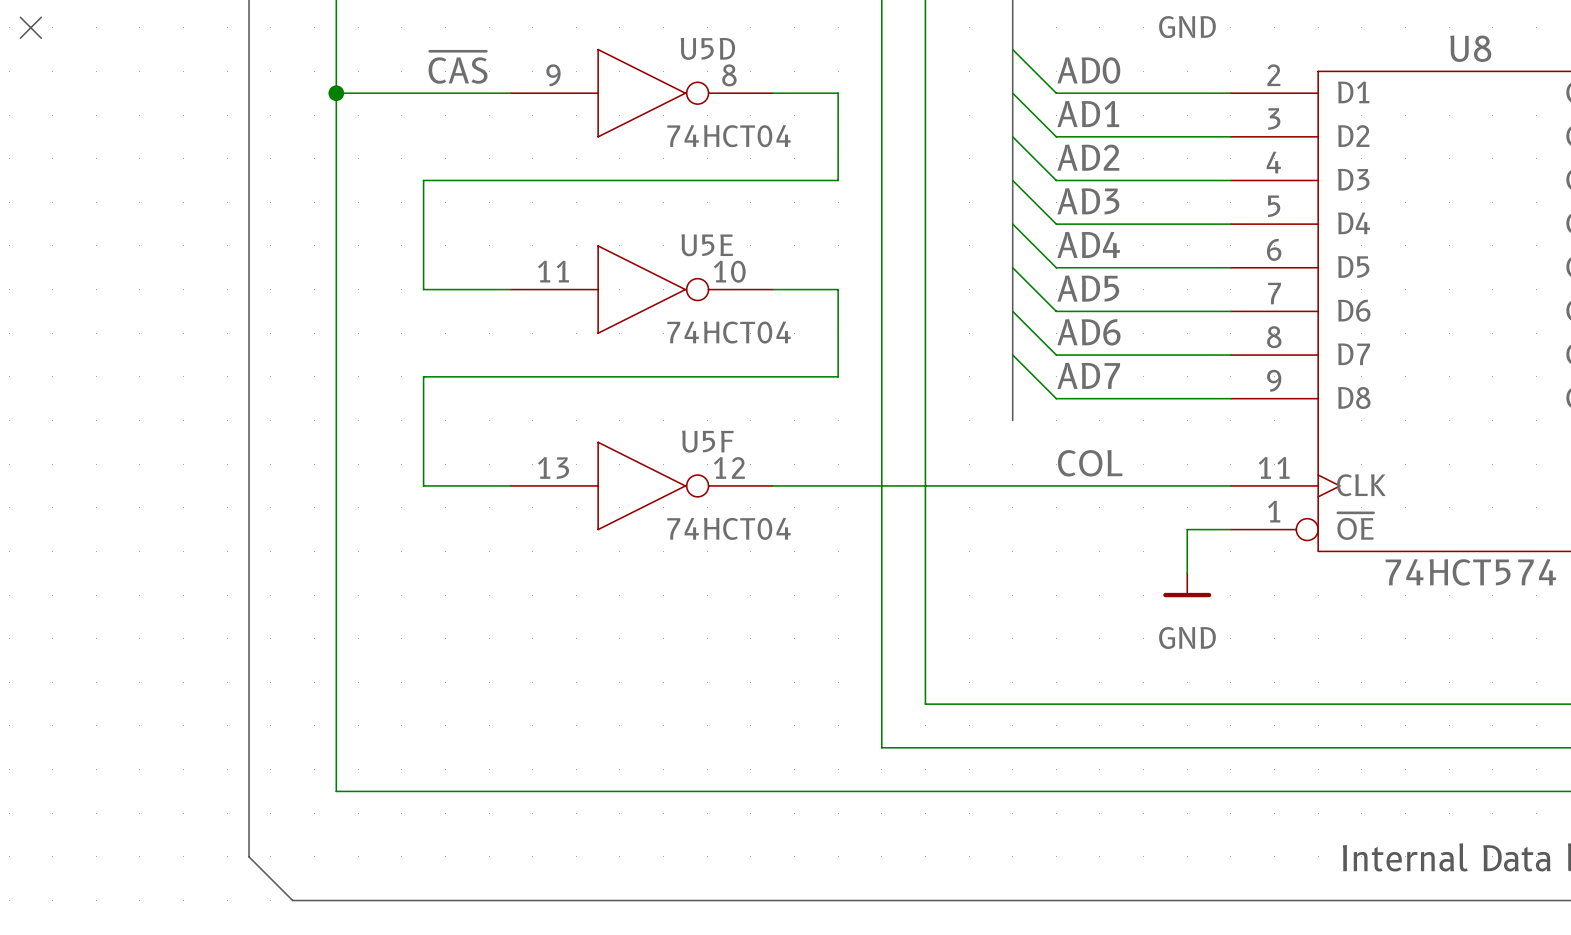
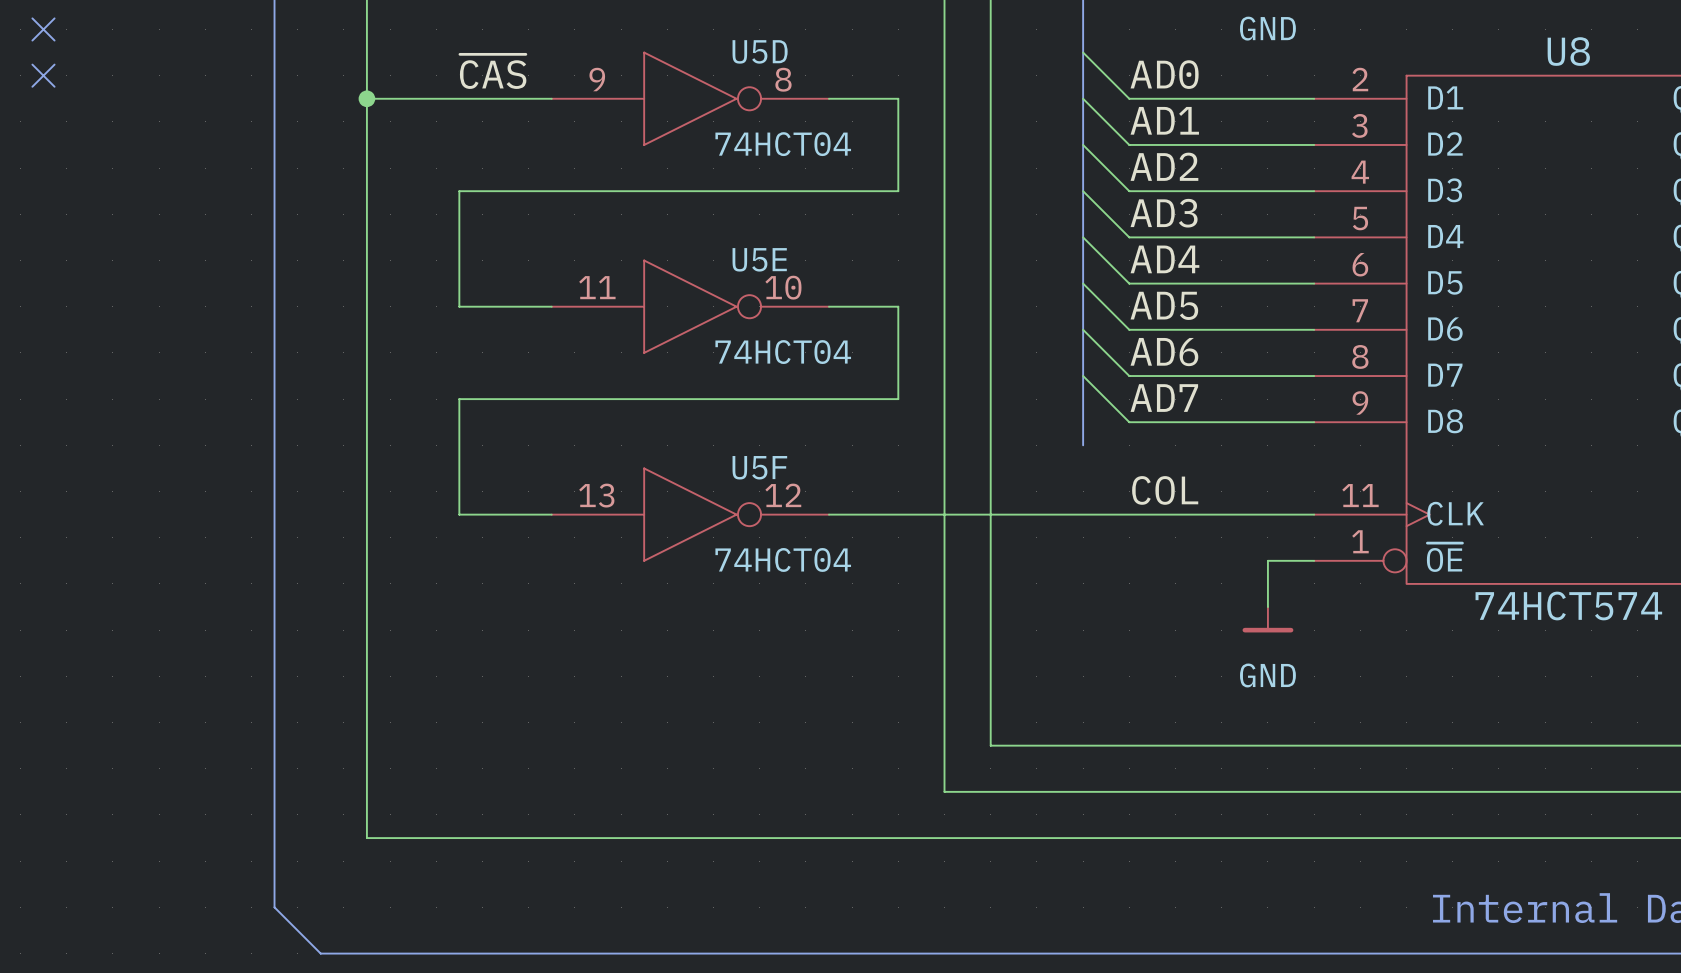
no-connect mark: none -> (43, 75)

